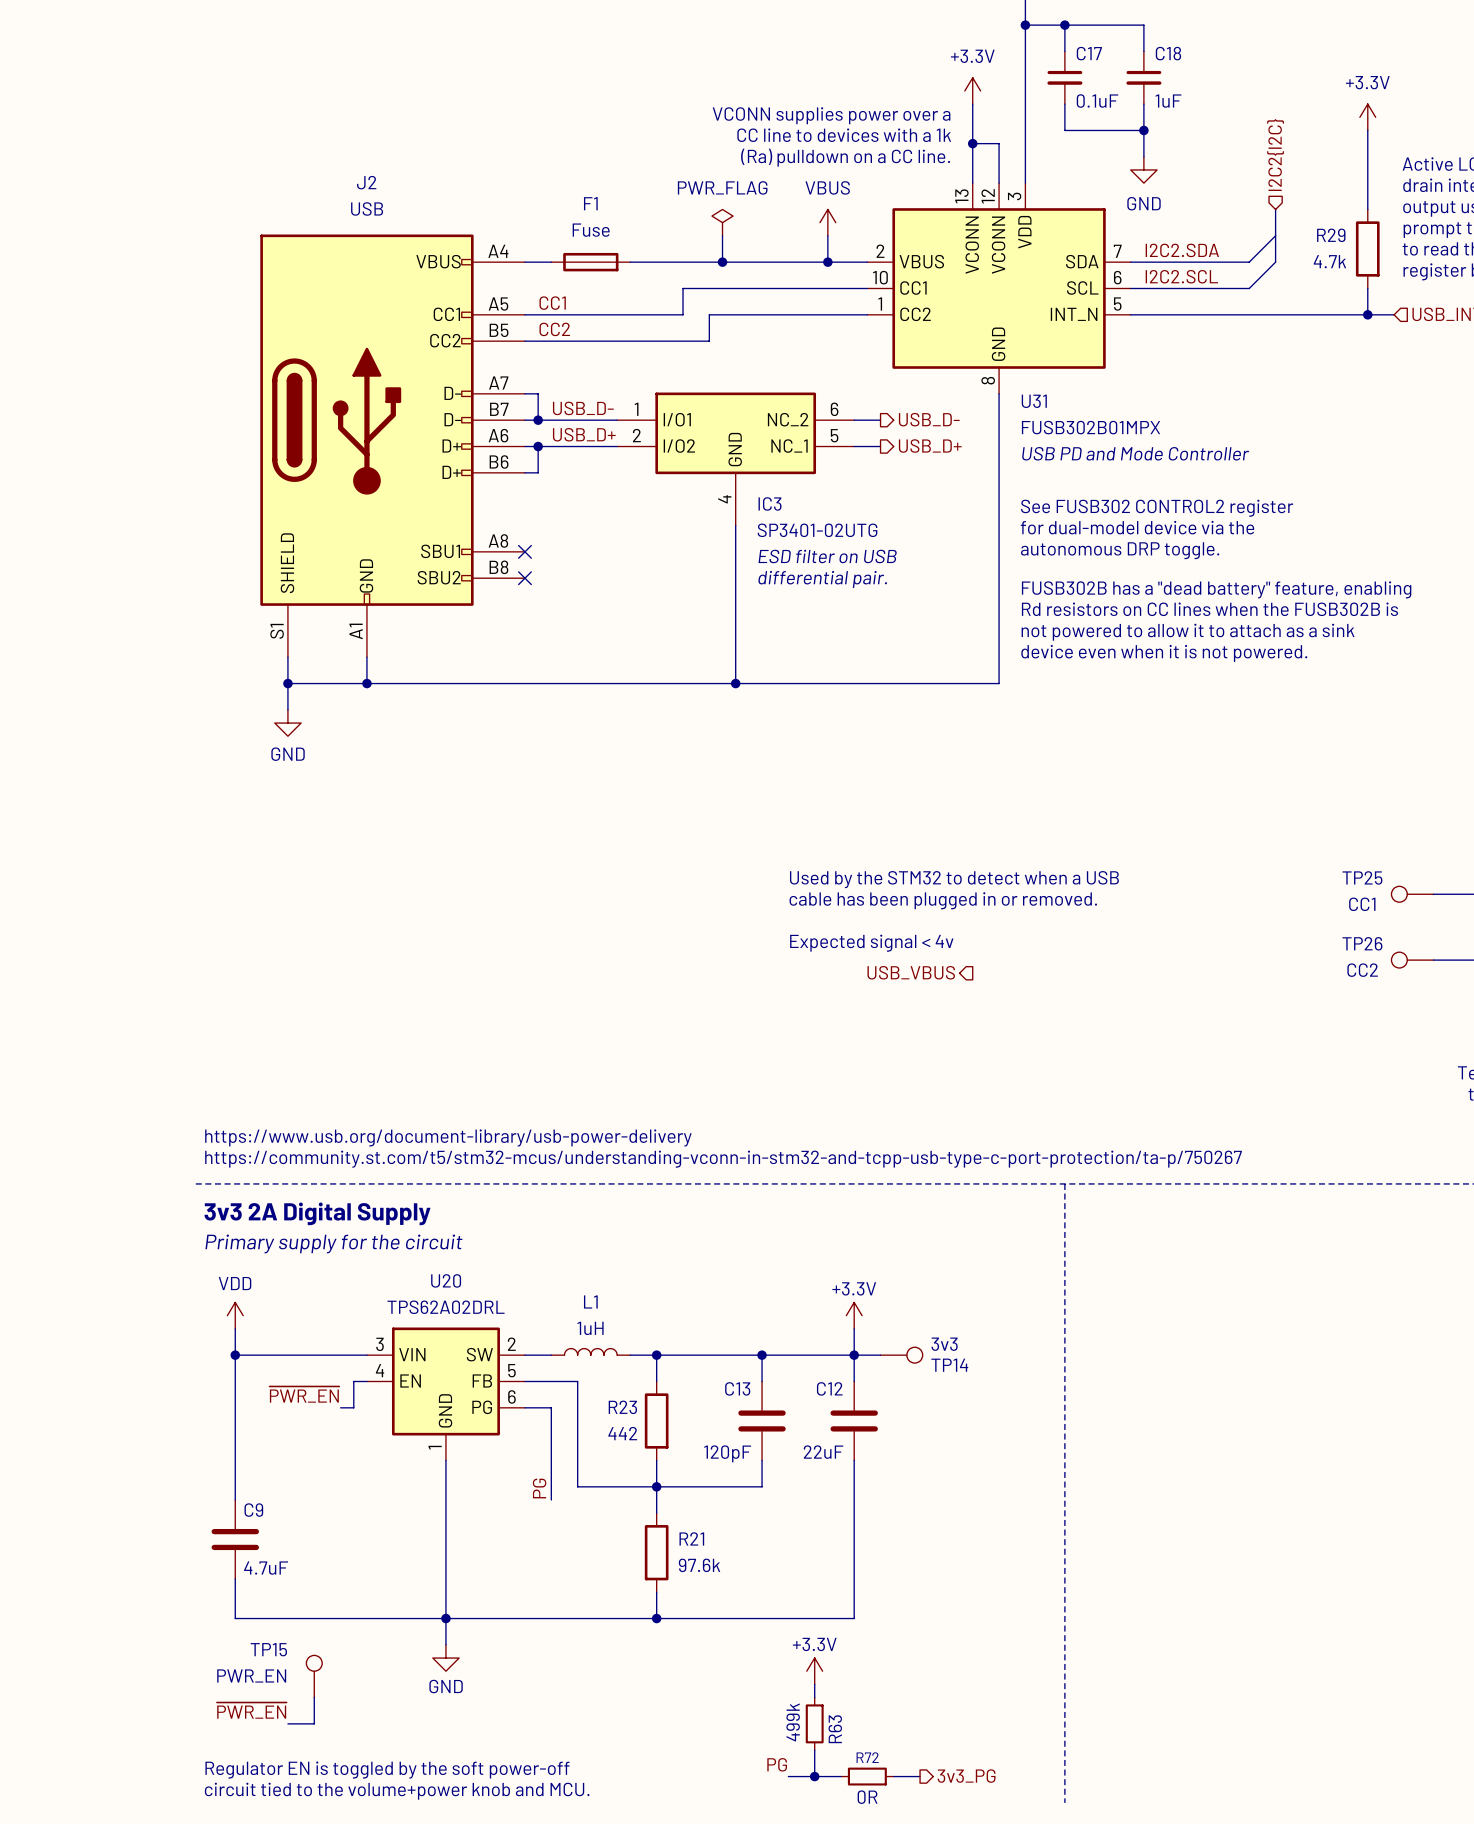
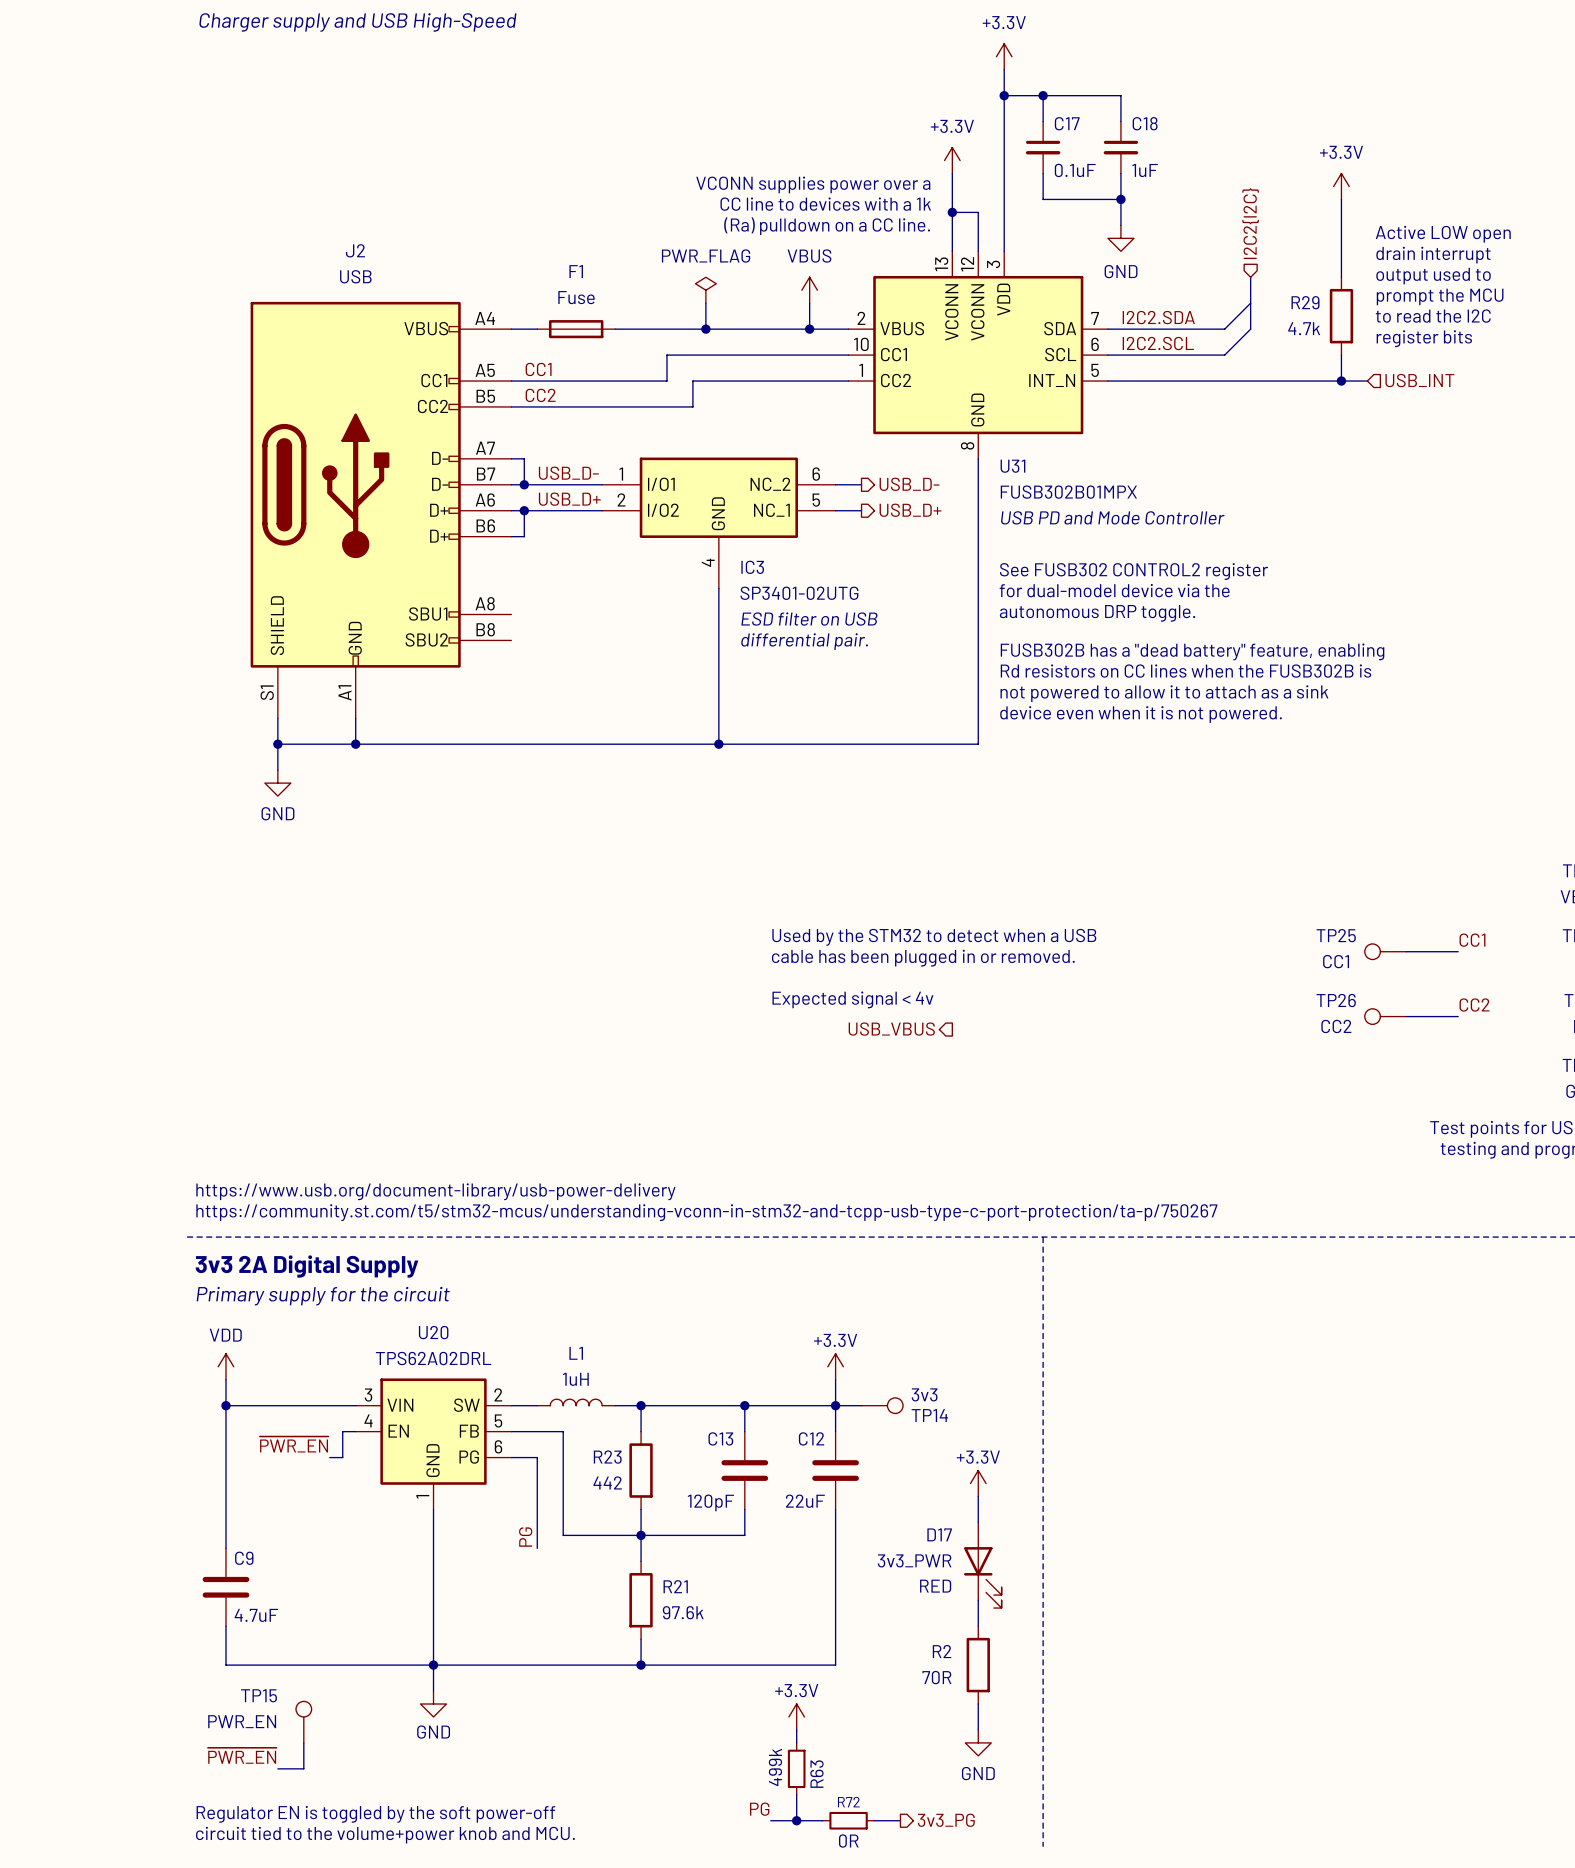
no-connect mark: (524, 551) -> none
no-connect mark: (524, 578) -> none
power symbol: none -> +3.3V (978, 1483)
wire: none -> (978, 1496) (978, 1522)
D17: none -> 3v3_PWR (982, 1565)
wire: none -> (978, 1600) (978, 1626)
R2: none -> 70R (978, 1665)
wire: none -> (978, 1704) (978, 1729)
power symbol: none -> GND (978, 1742)

